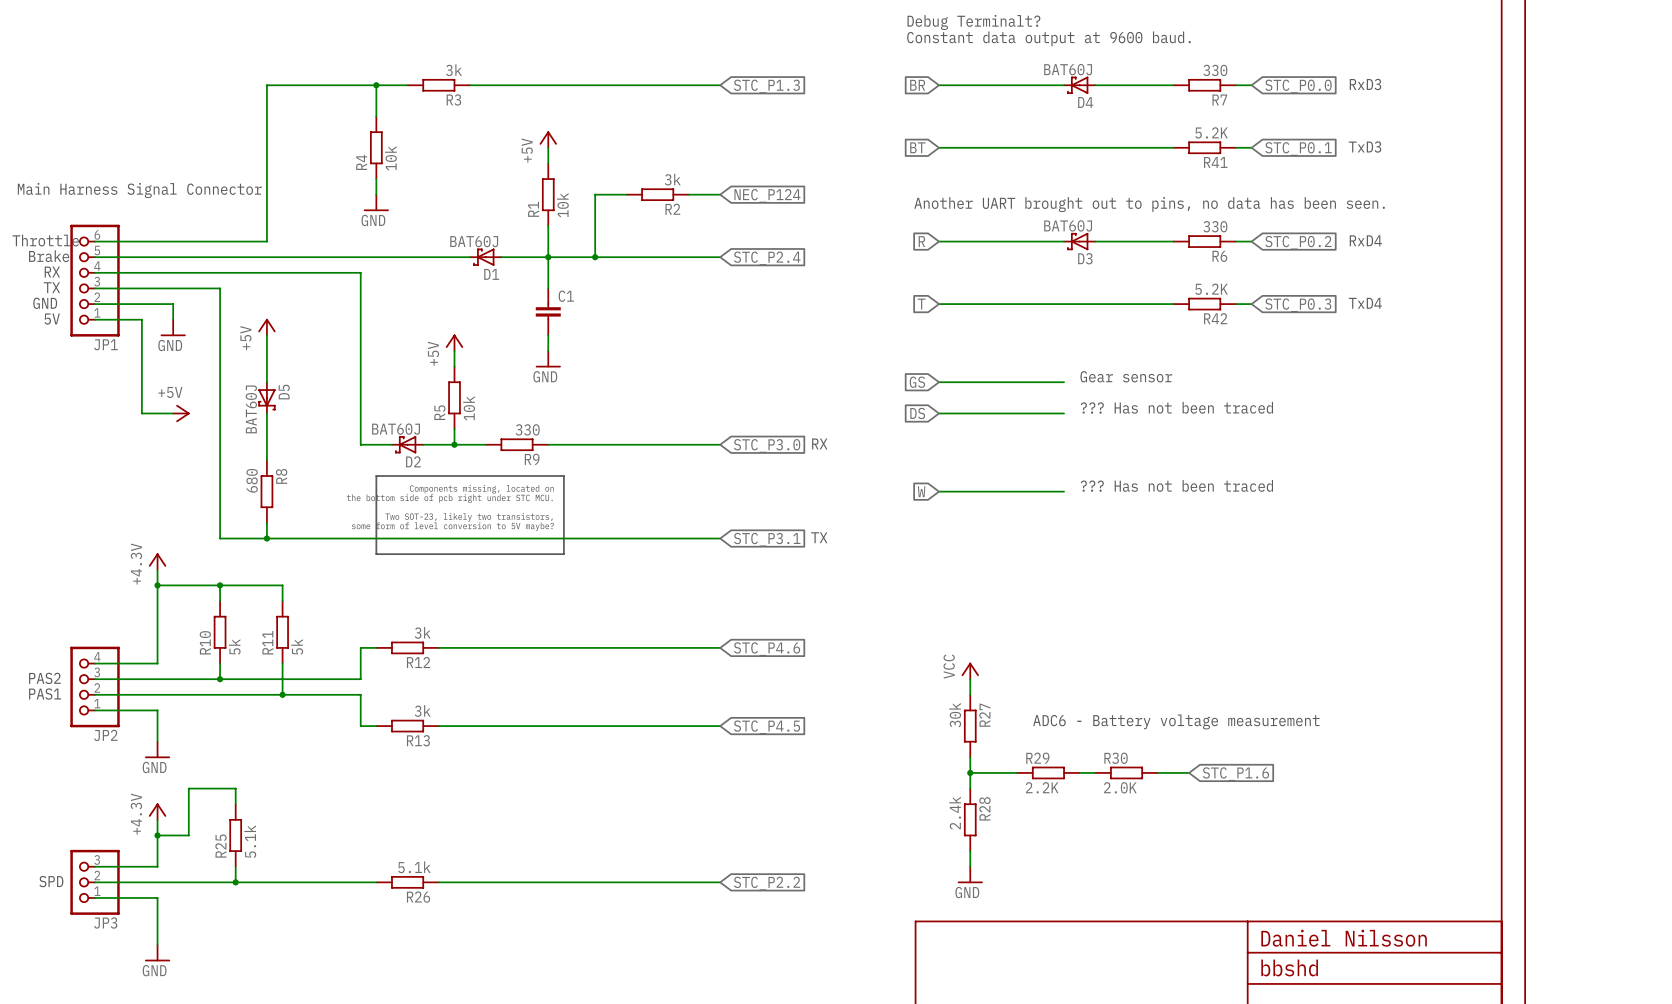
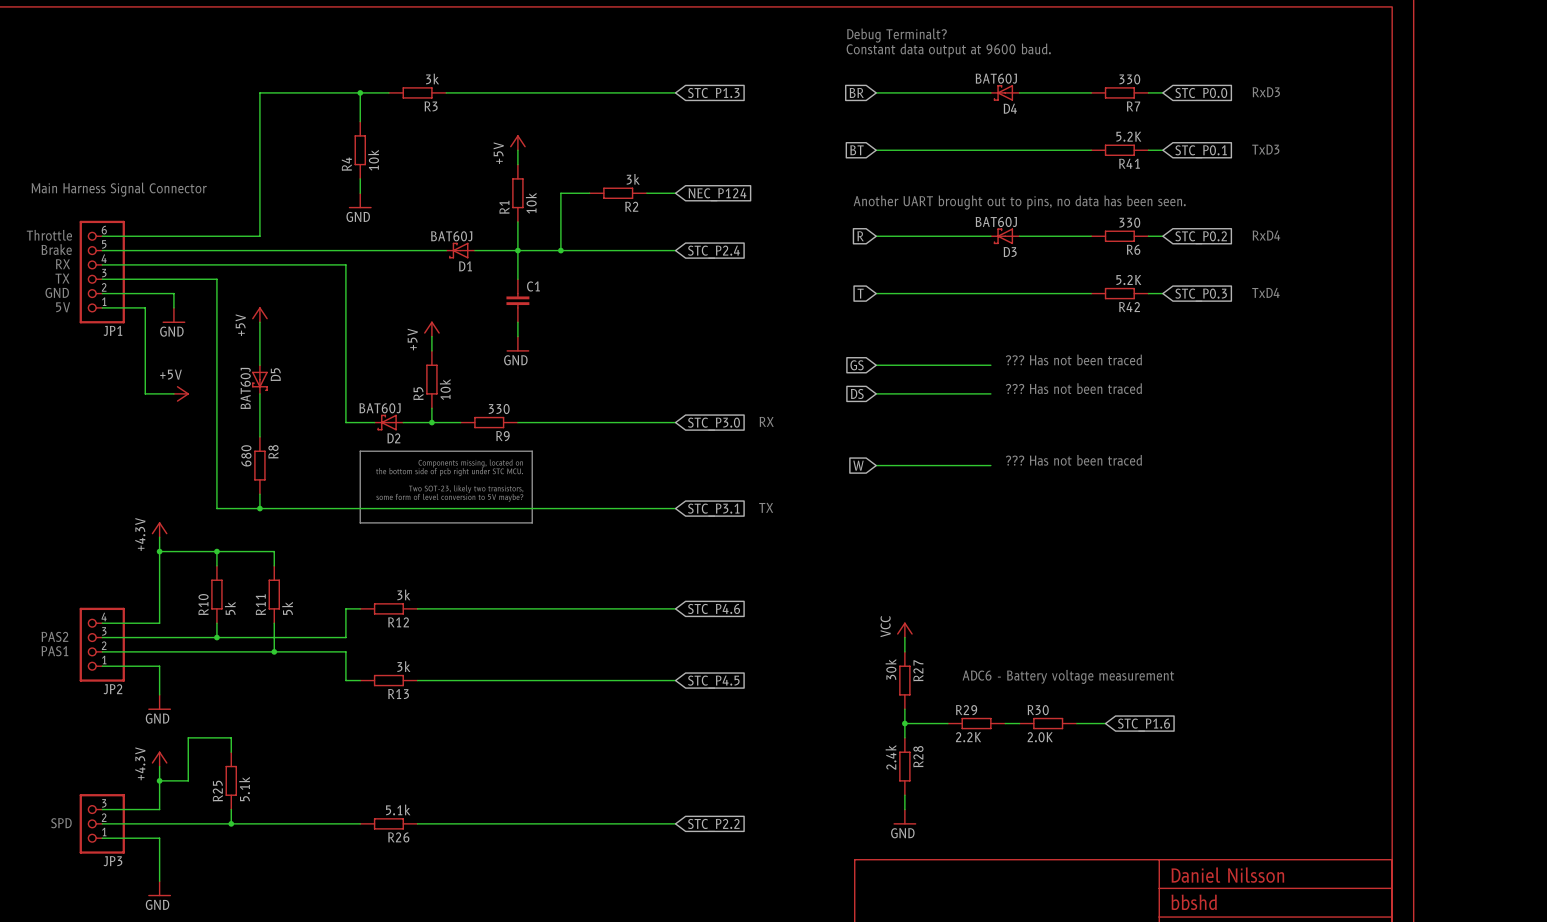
text: Gear sensor (1126, 376) -> ??? Has not been traced (1073, 359)

